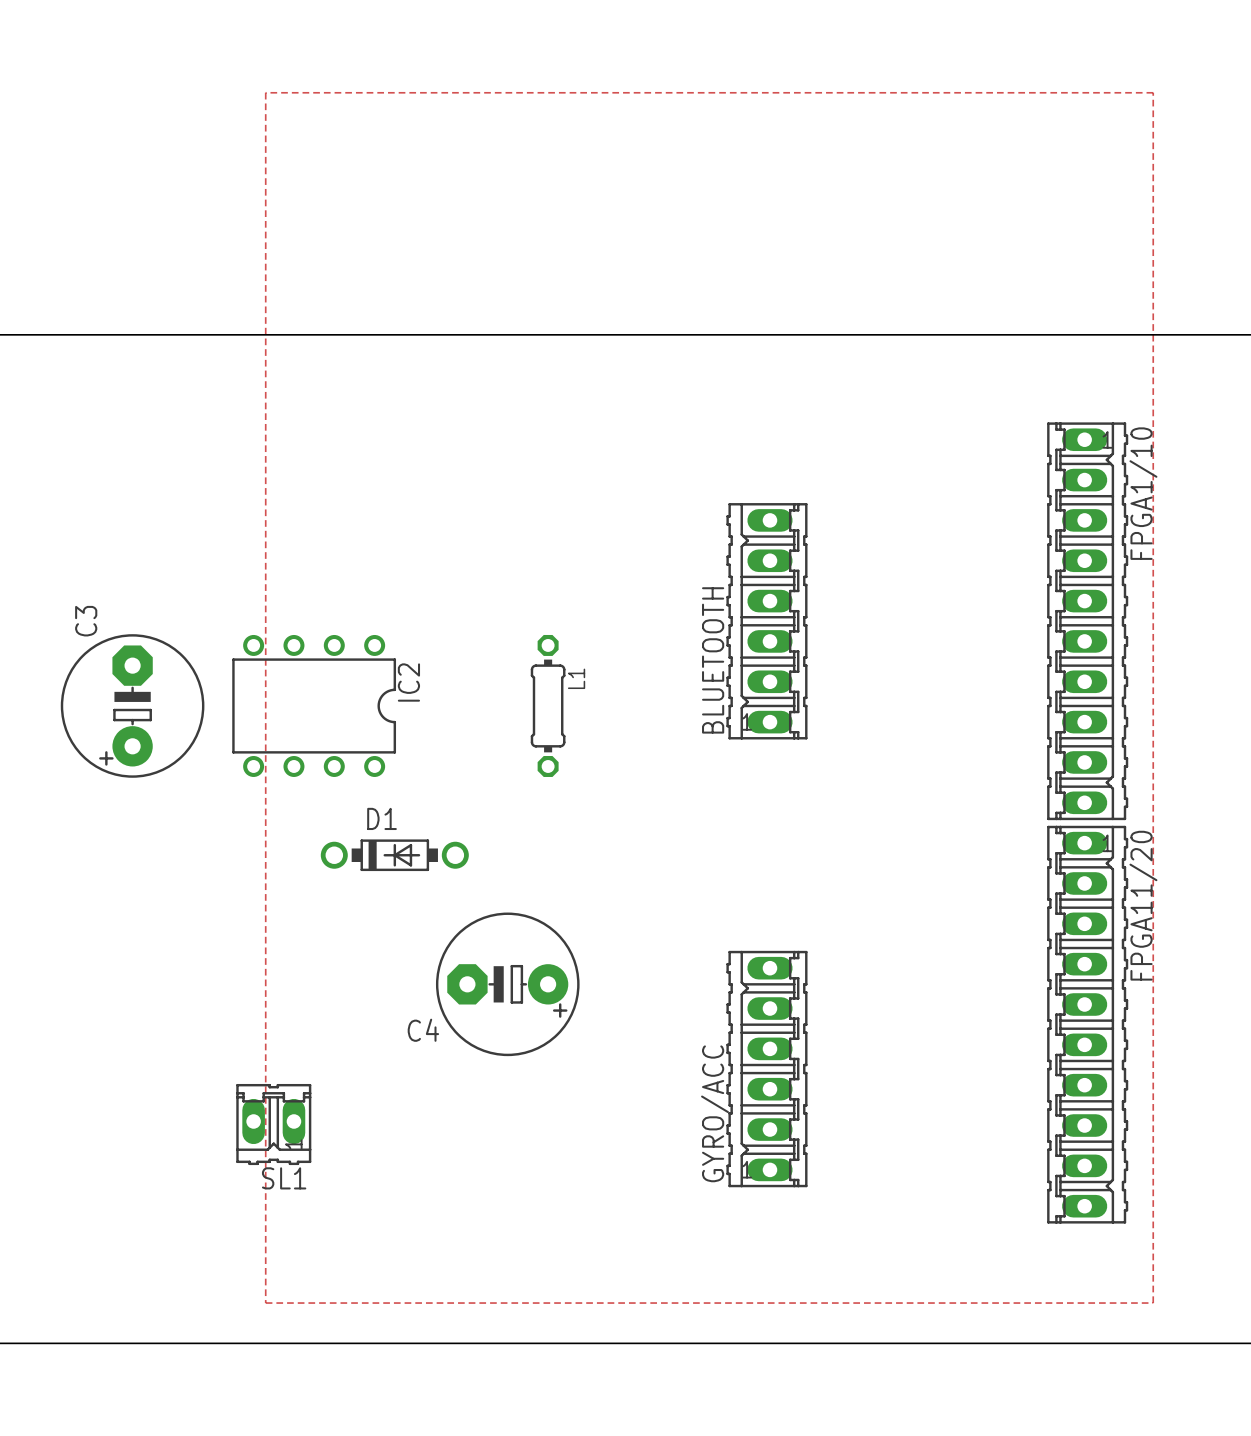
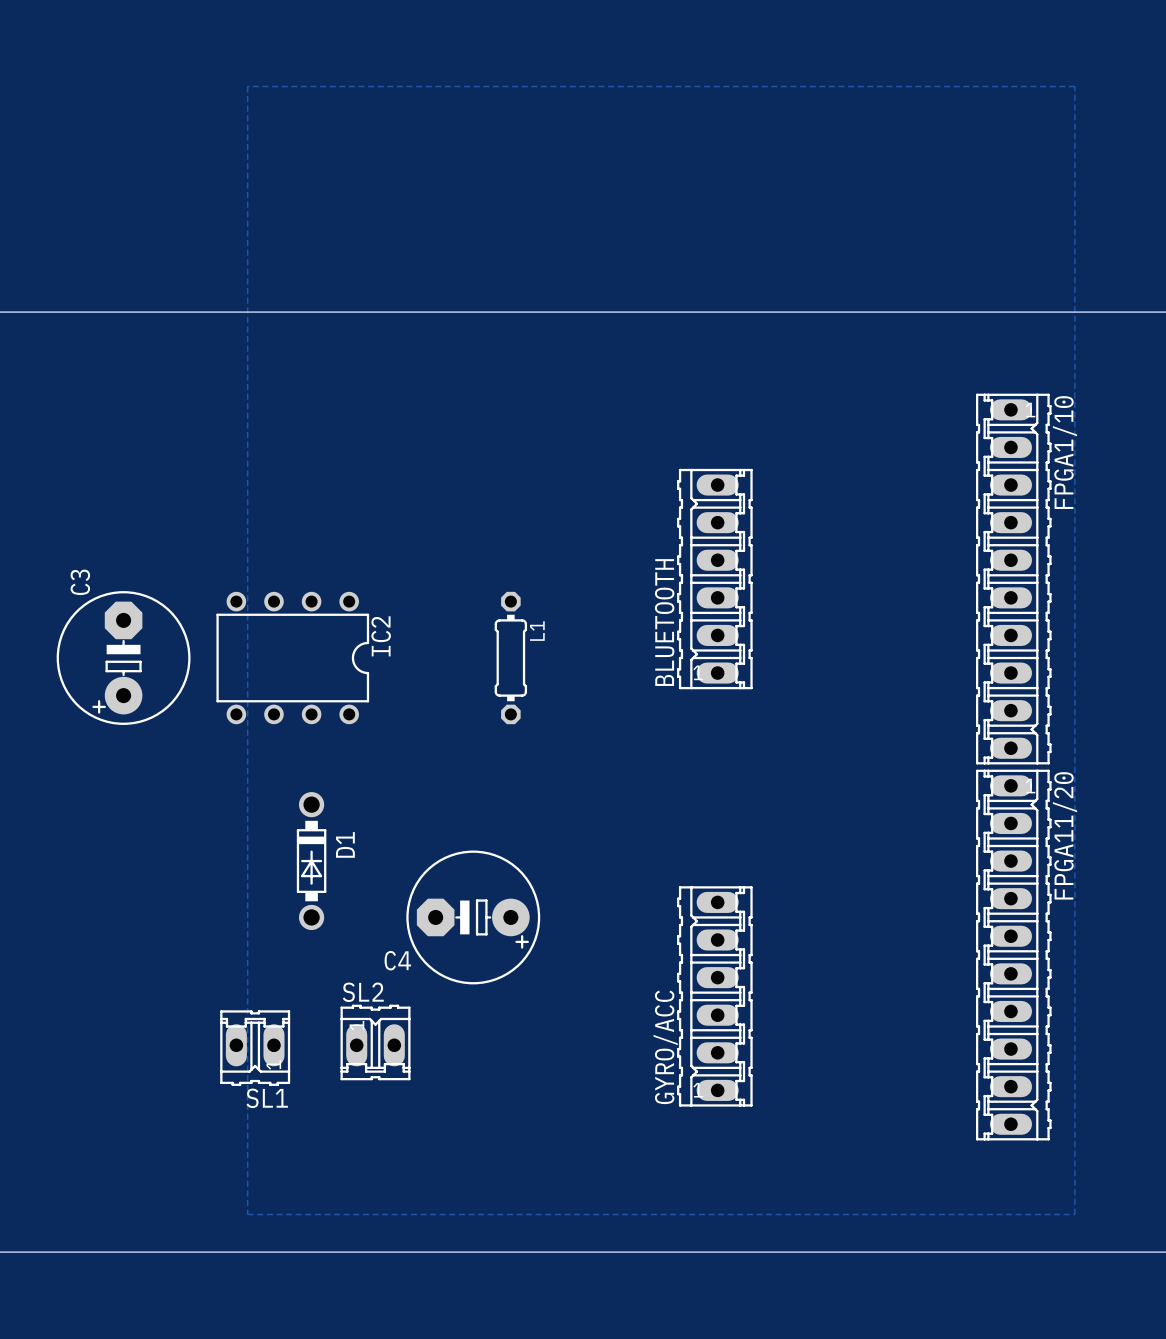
D1 rotation: 0° (394, 855) -> 90° clockwise (311, 861)
D1 position: (394, 855) -> (311, 861)
SL2: none -> (375, 1042)

